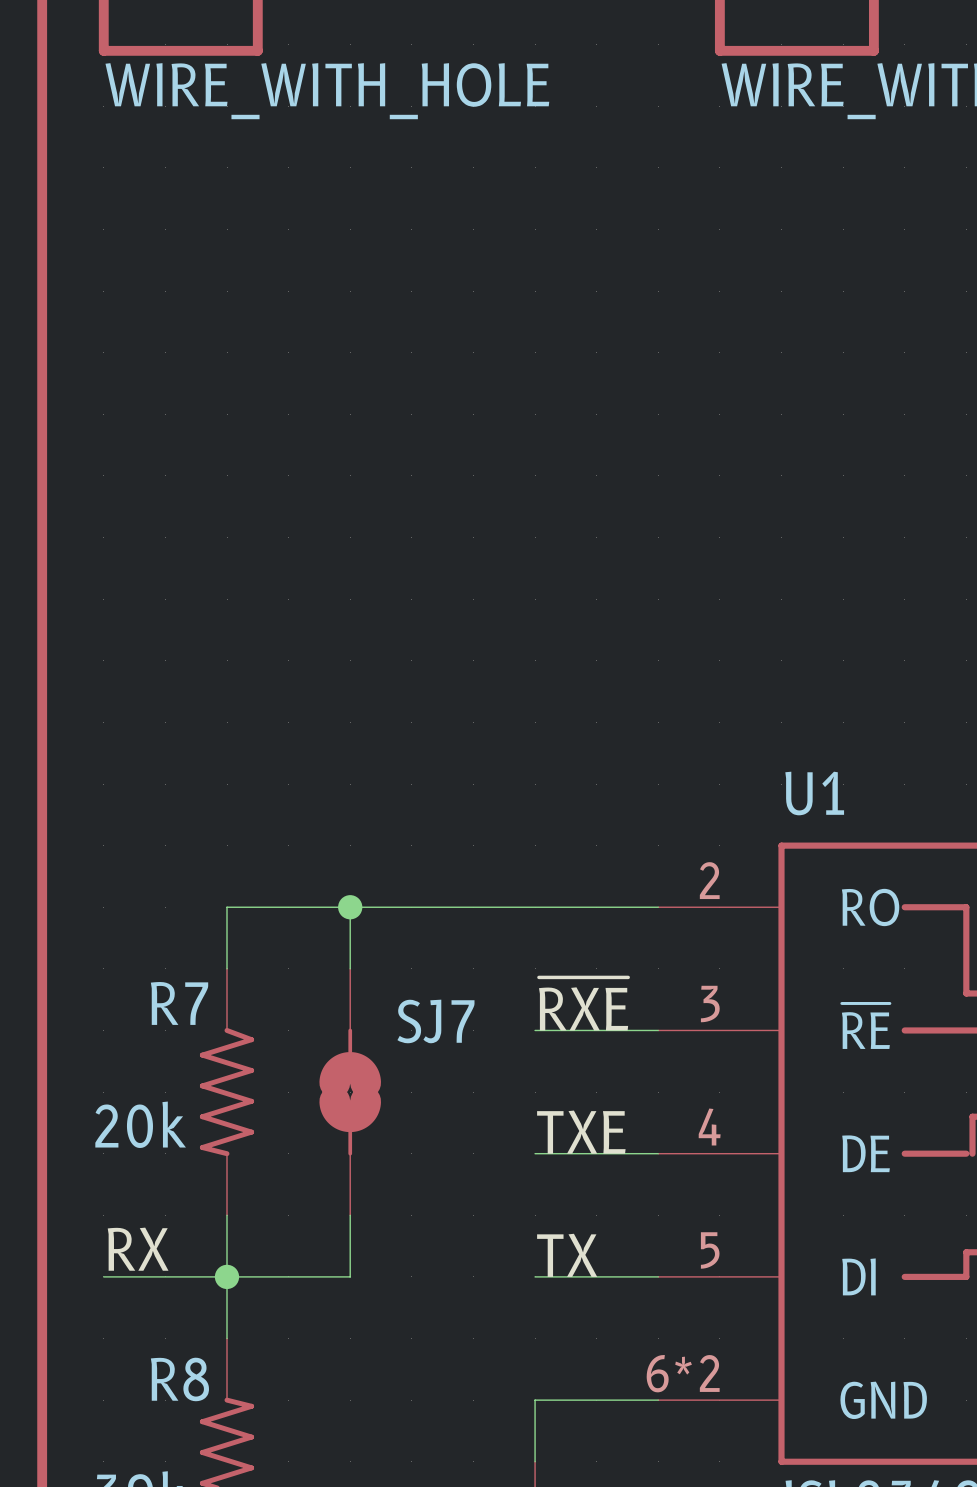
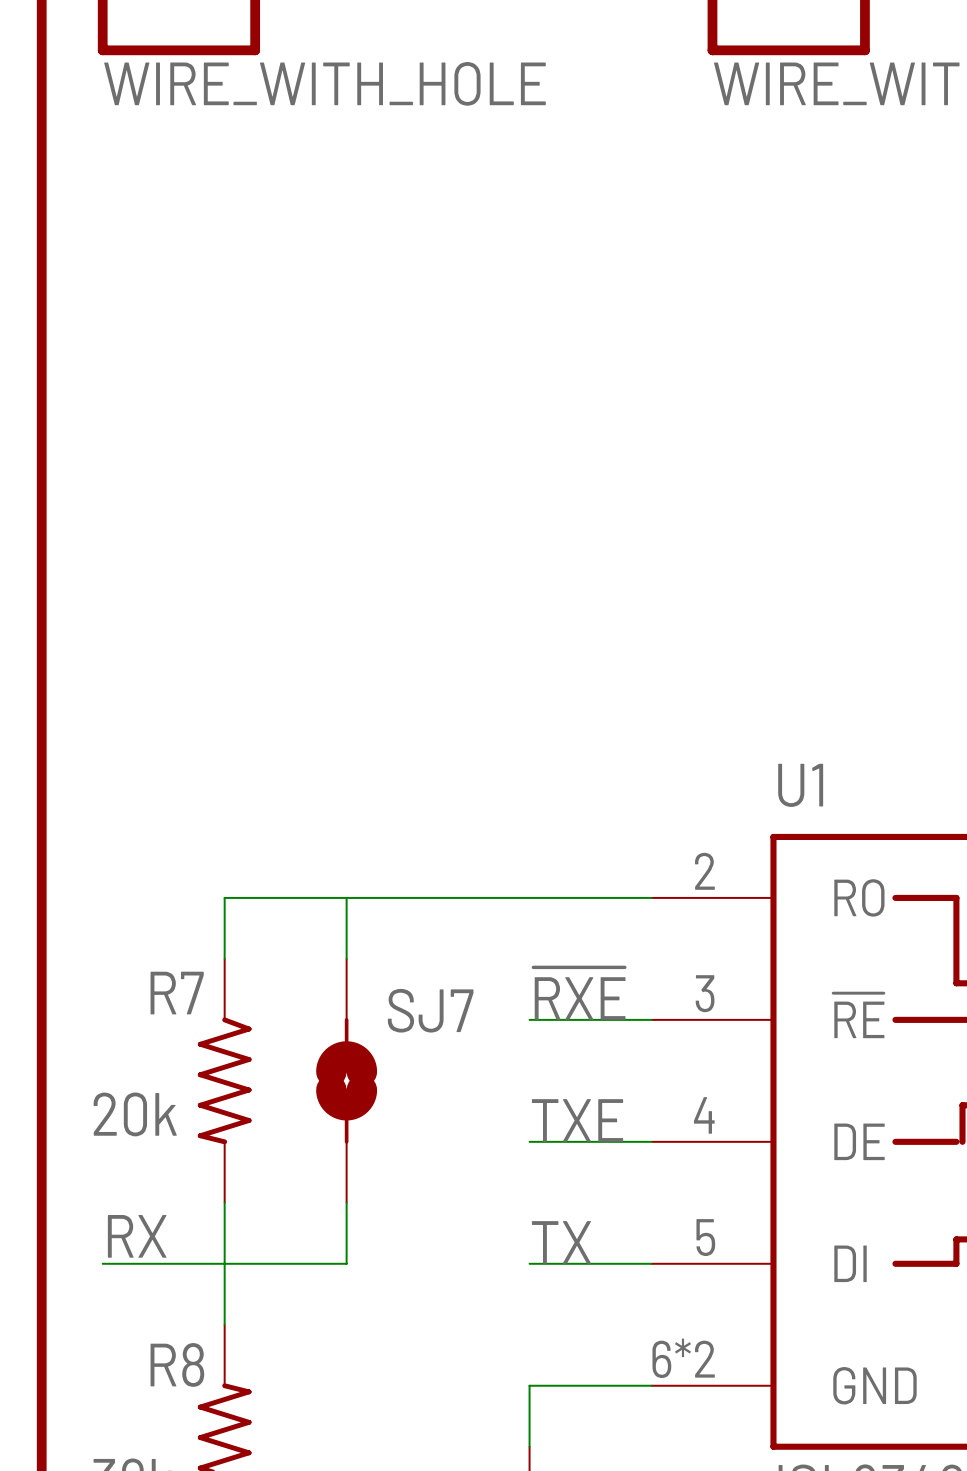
junction: (350, 907) -> none
junction: (227, 1276) -> none

